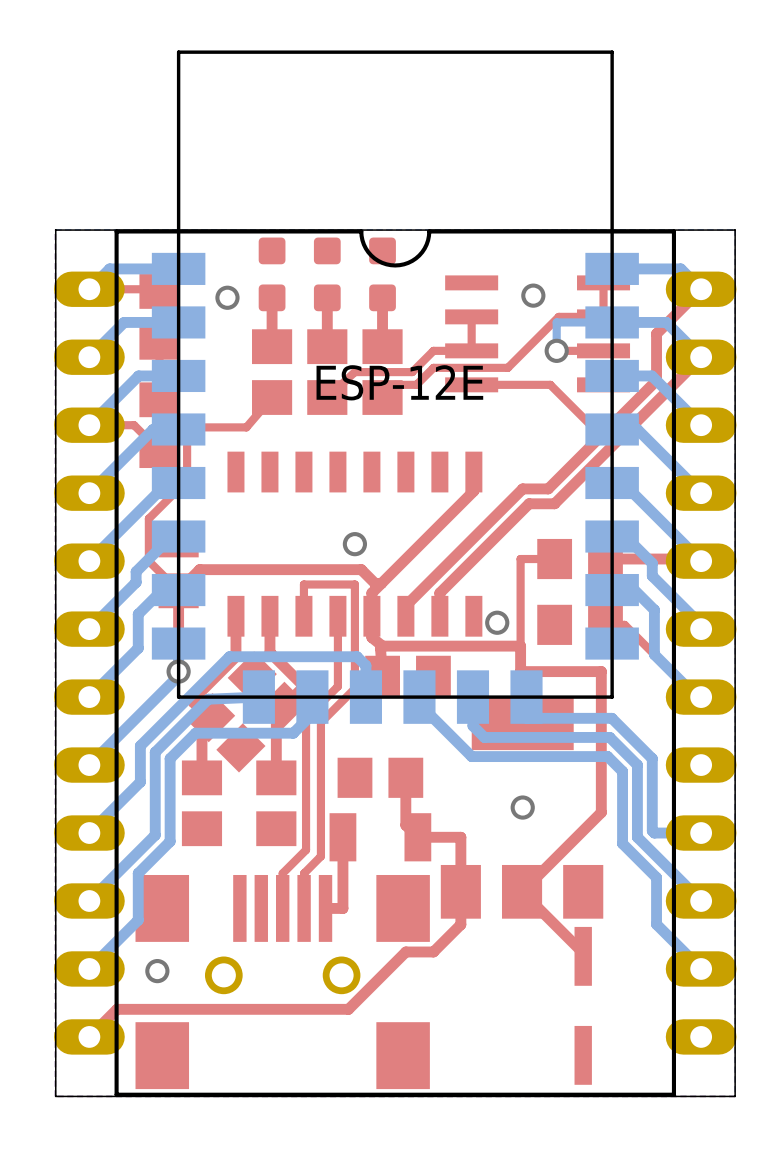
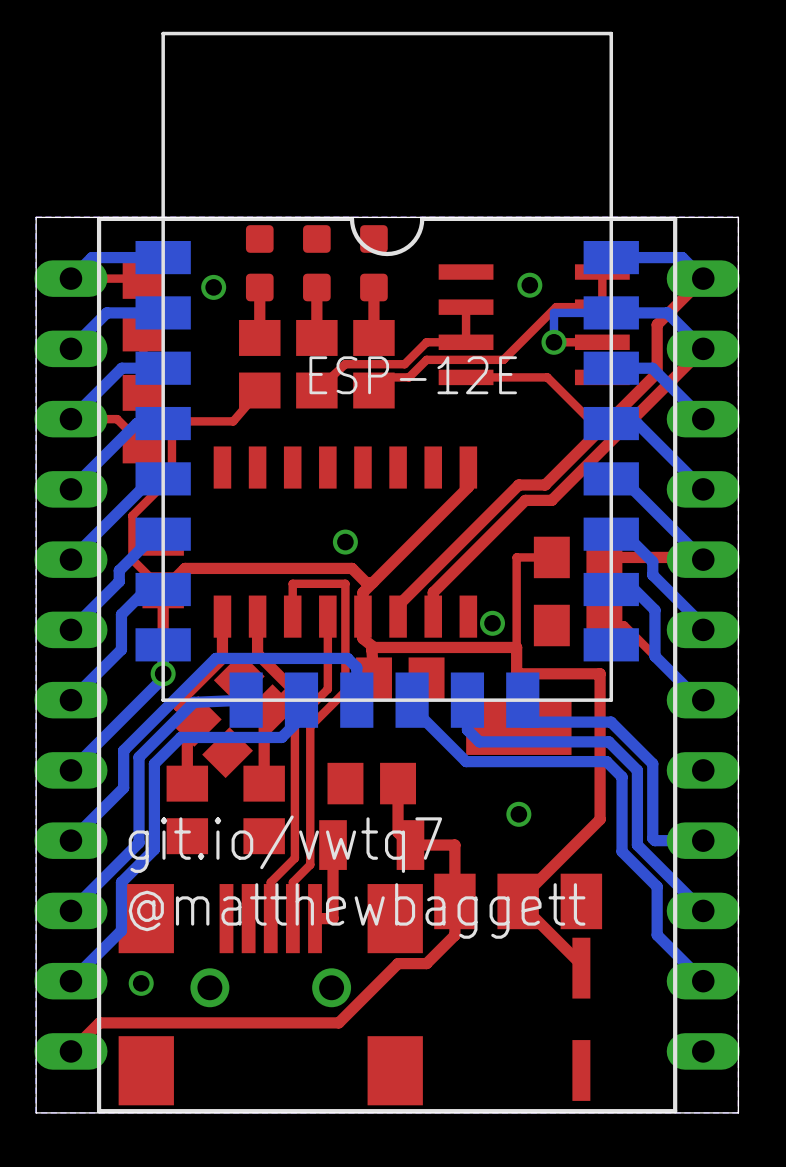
text: none -> git.io/vwtq7 (285, 844)
text: none -> @matthewbaggett (357, 910)

